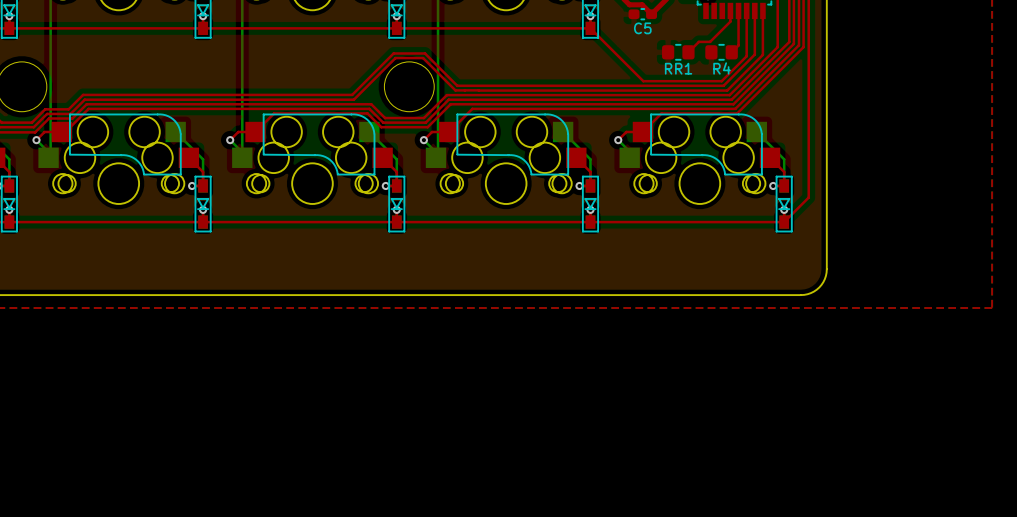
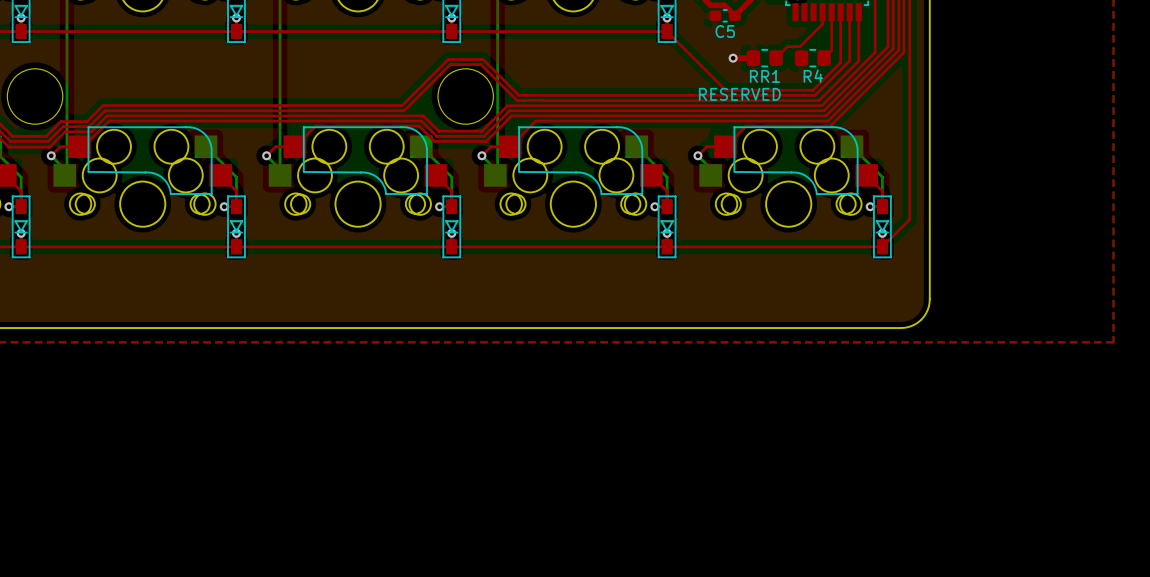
top track: none -> (733, 58) (753, 58)
via: none -> (733, 58)
text: none -> RESERVED (739, 94)

